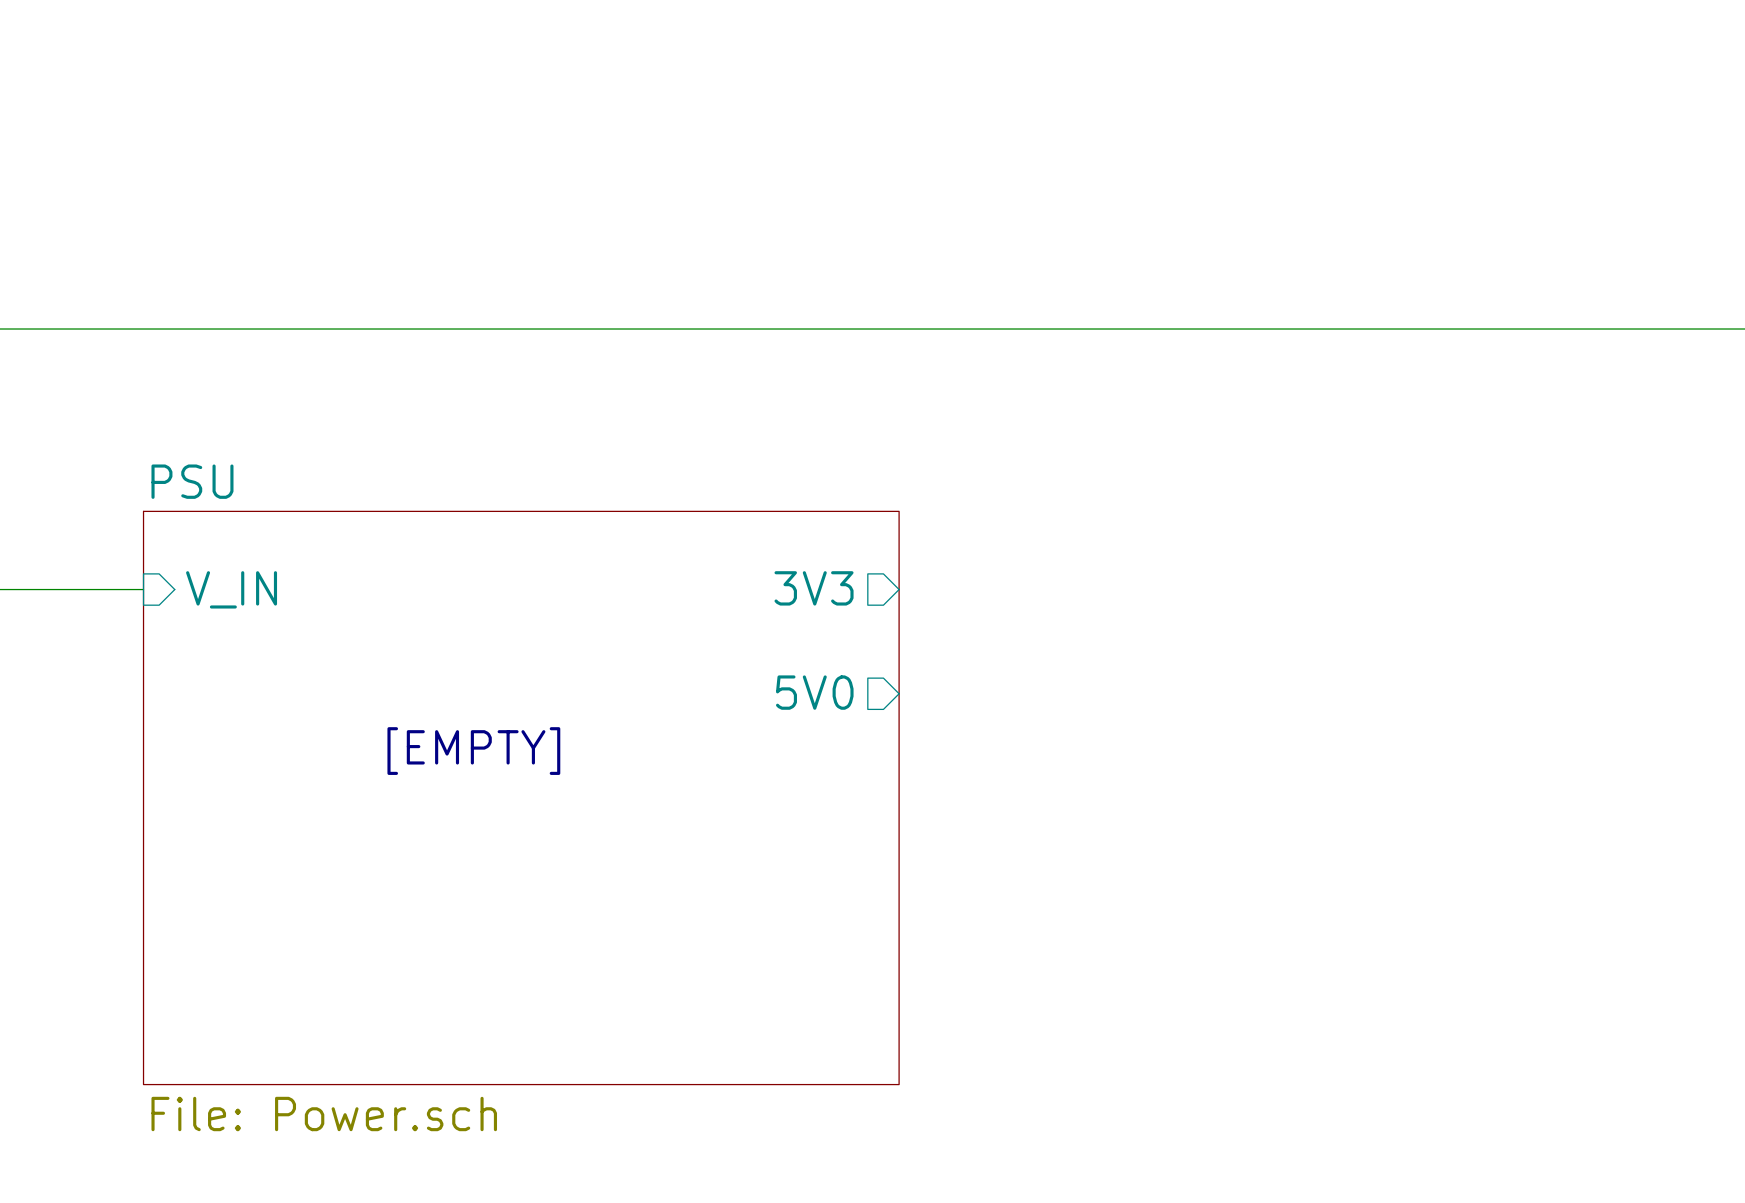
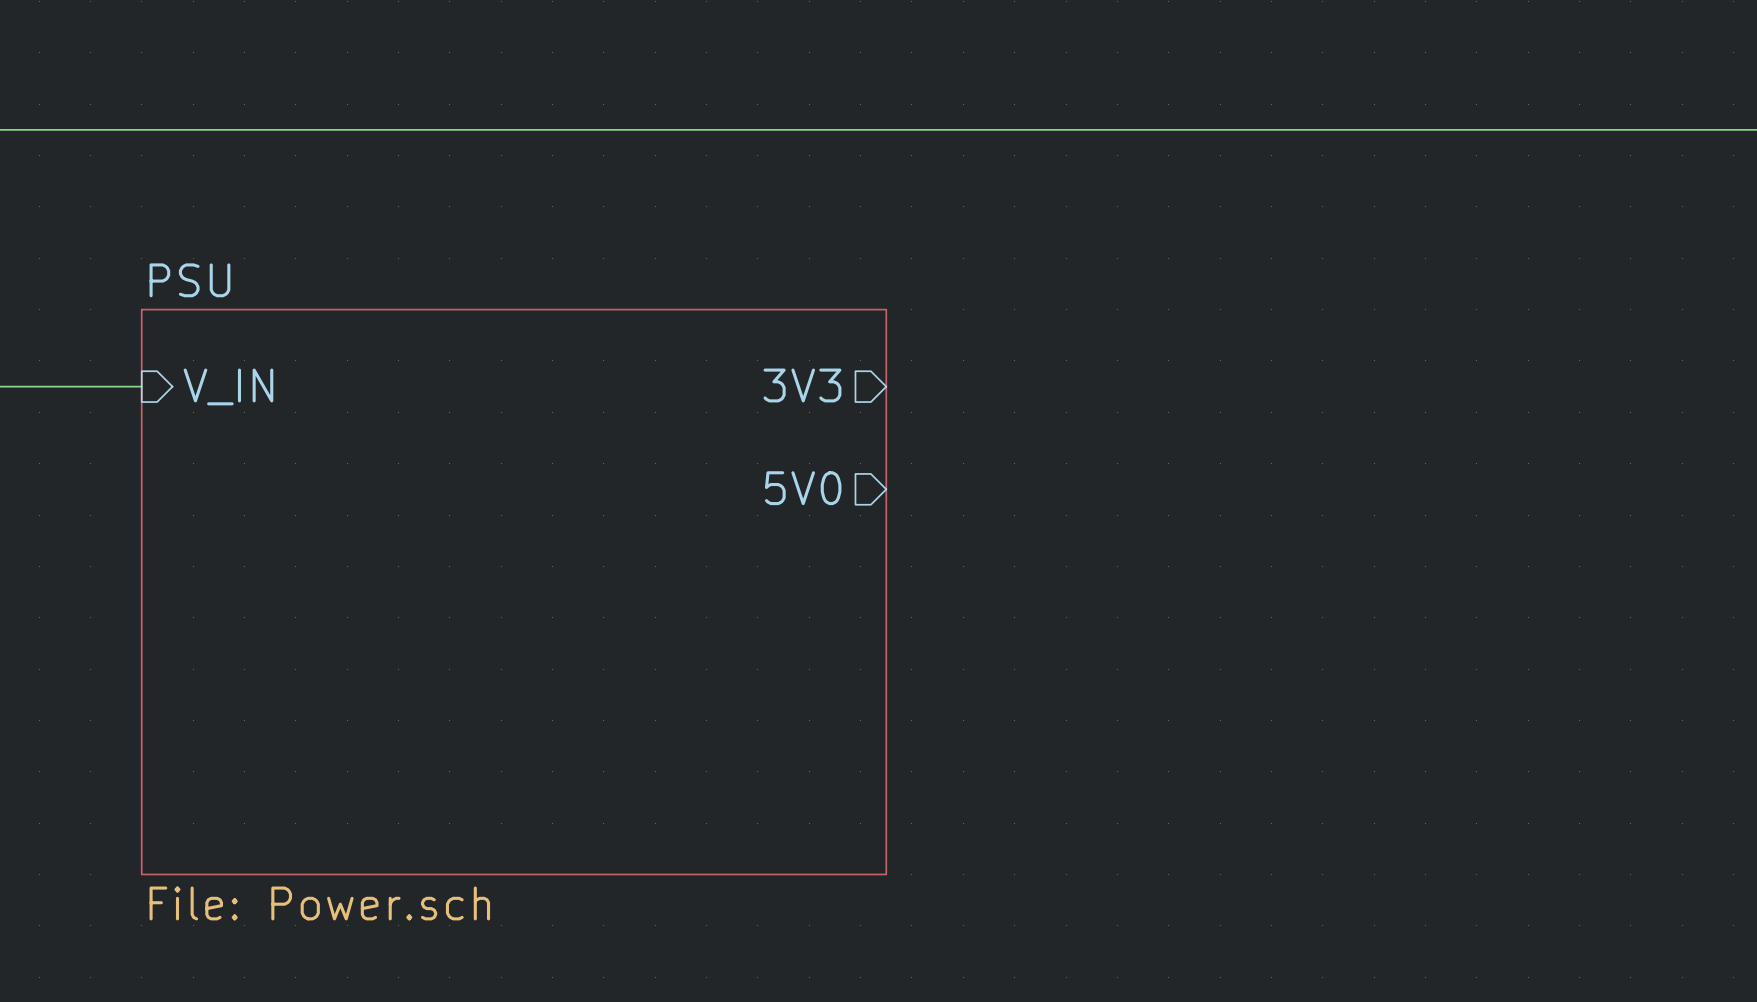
text: [EMPTY] (473, 751) -> none

